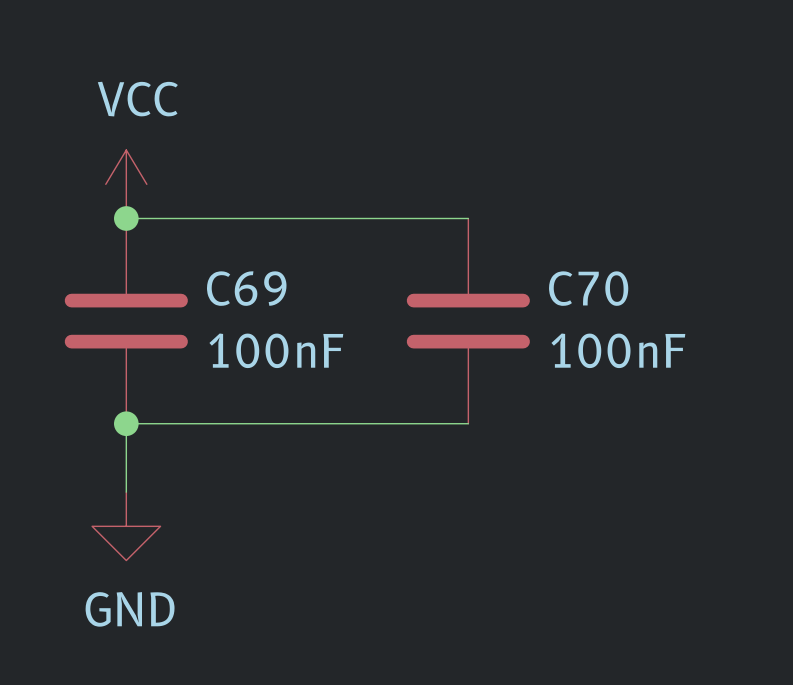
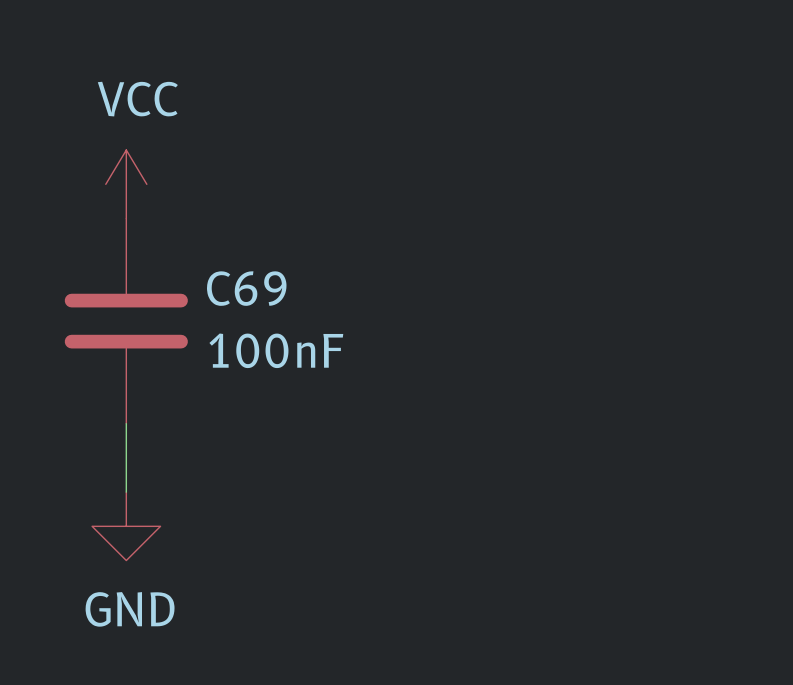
wire: (126, 218) (468, 218) -> none
junction: (126, 218) -> none
C70: 100nF (468, 321) -> none
wire: (126, 423) (468, 423) -> none
junction: (126, 423) -> none

